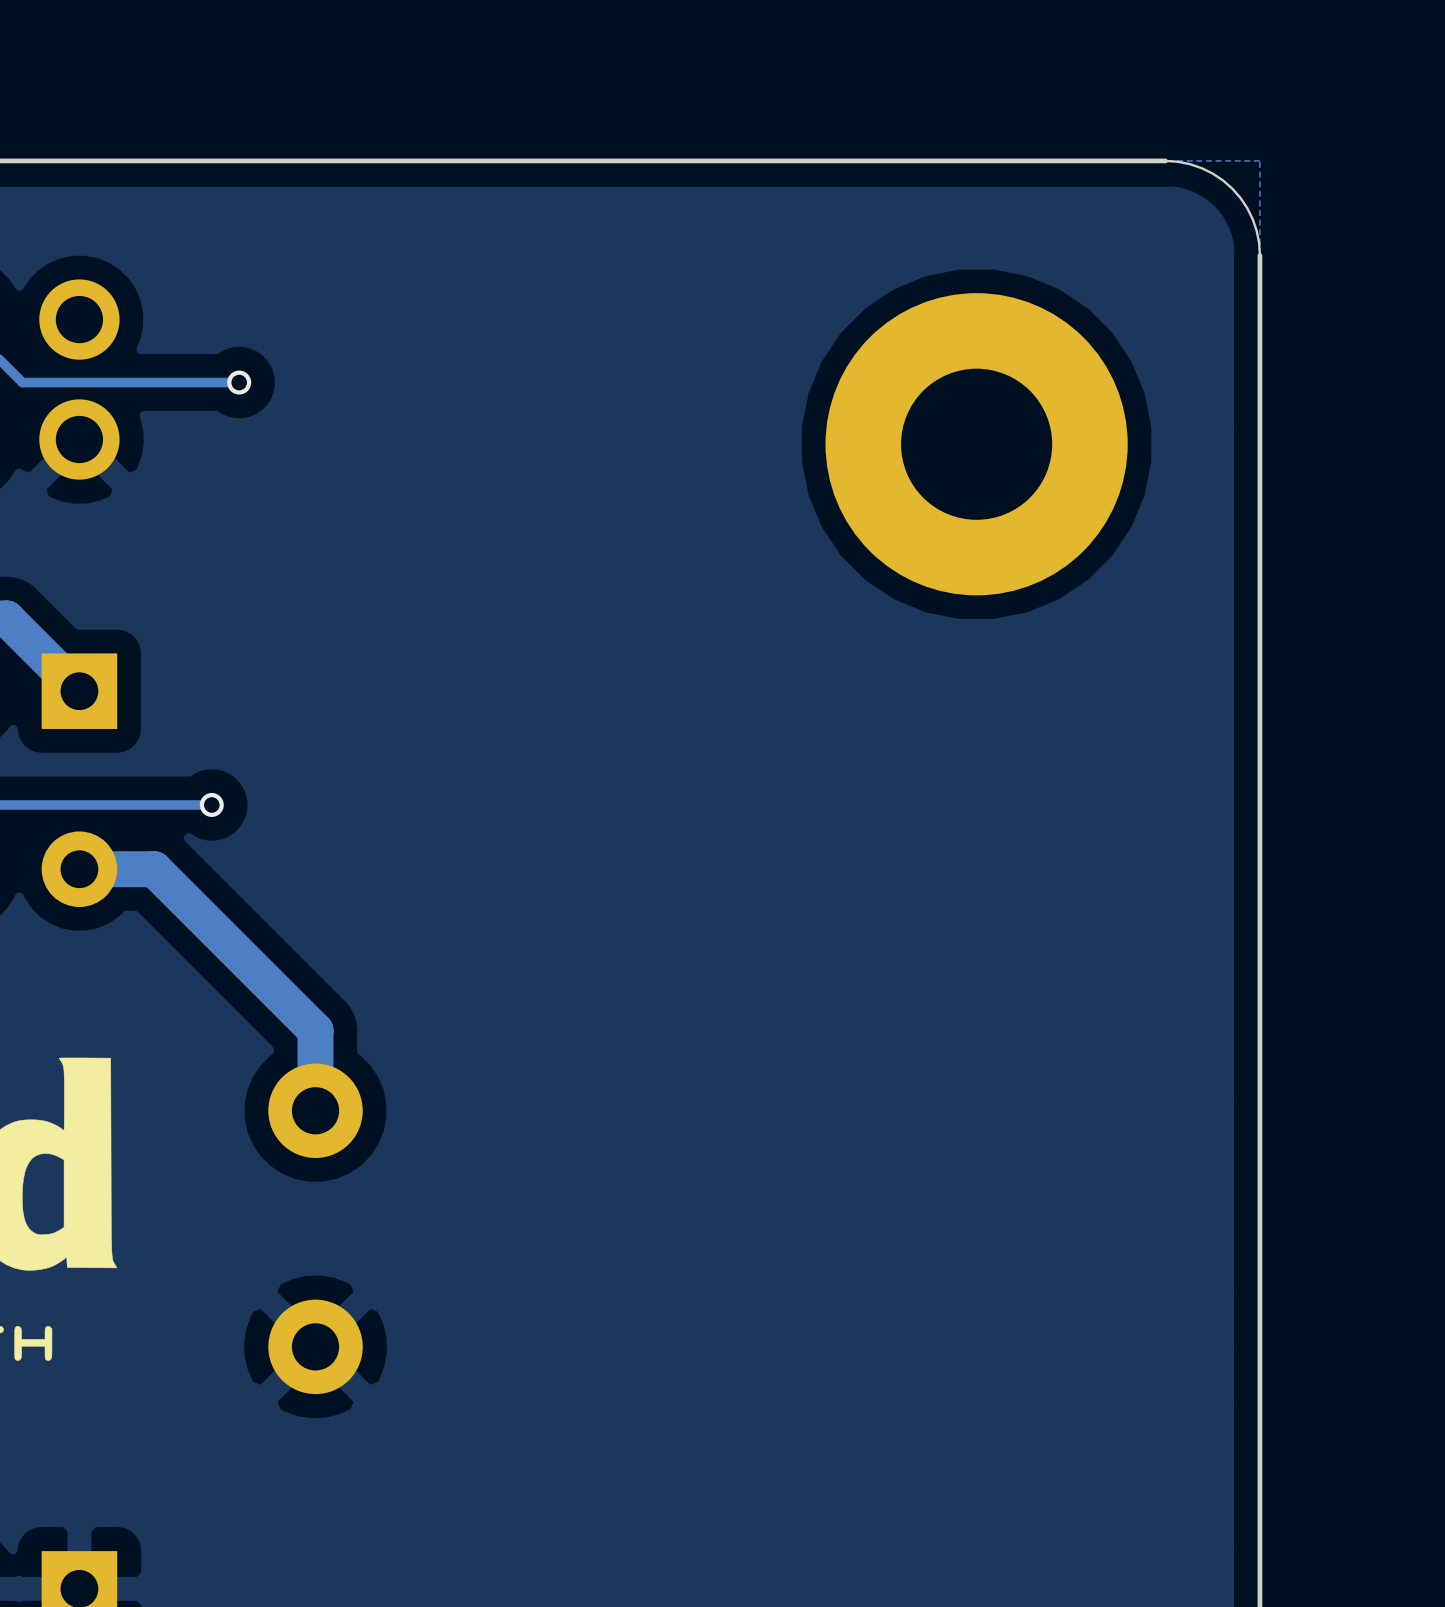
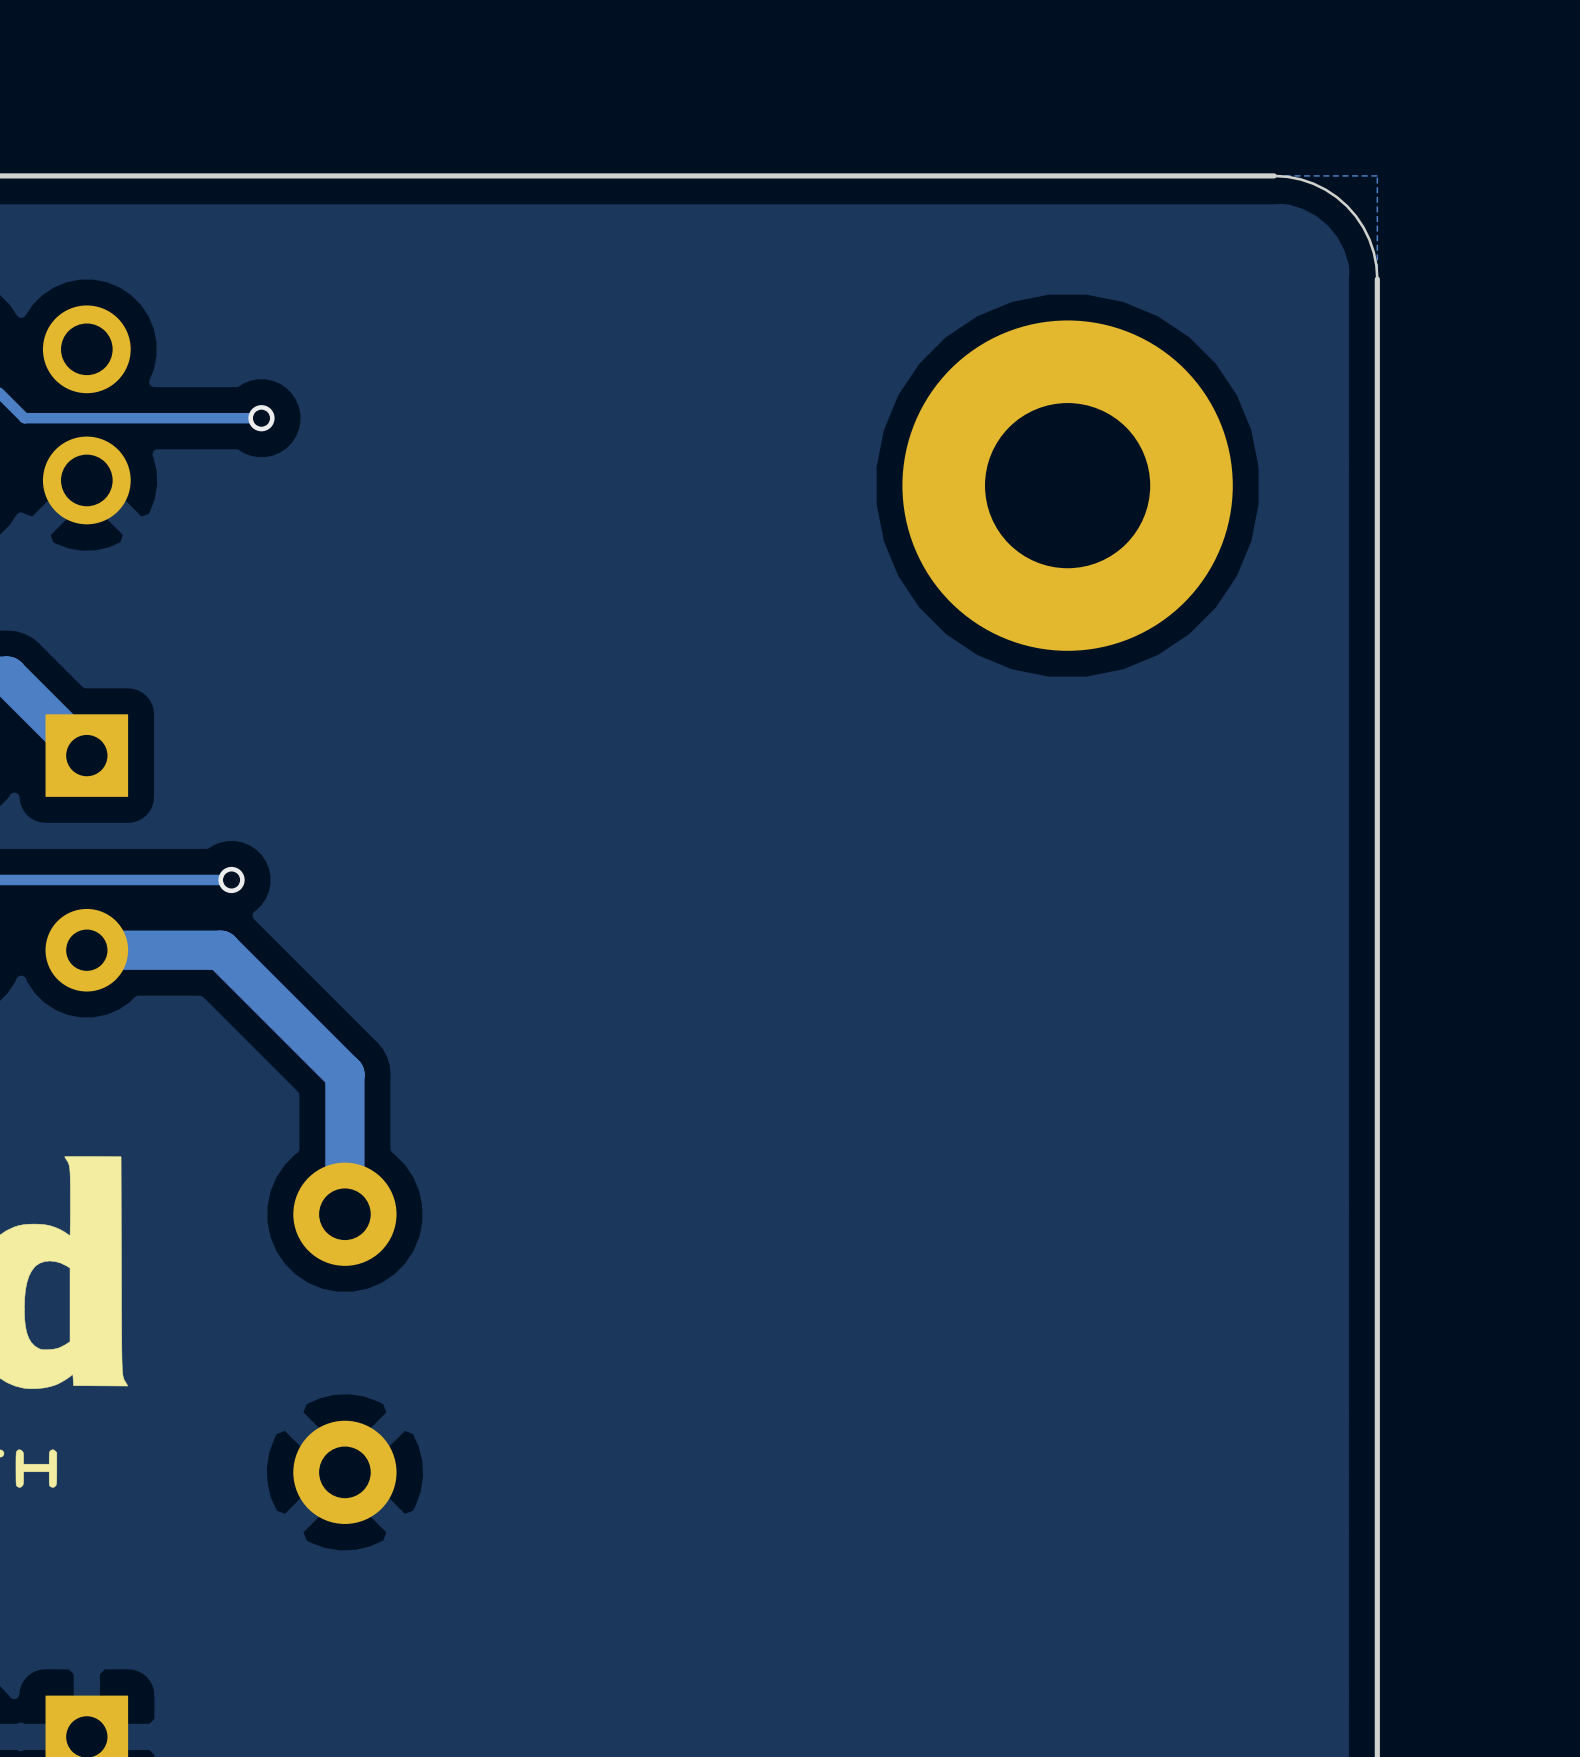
track: (154, 869) (315, 1030) -> (168, 950) (220, 950) (344, 1074) (344, 1126)

